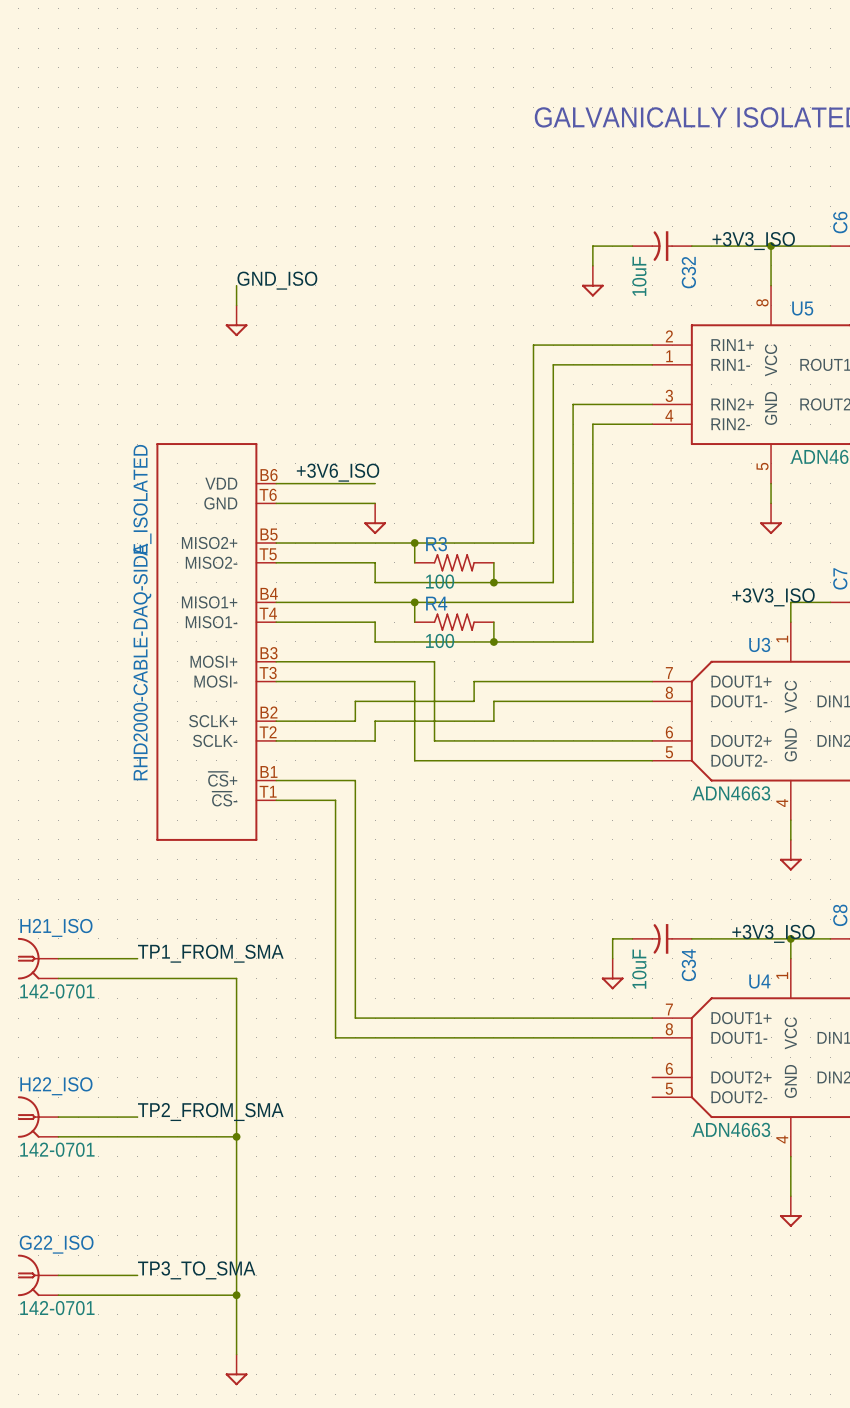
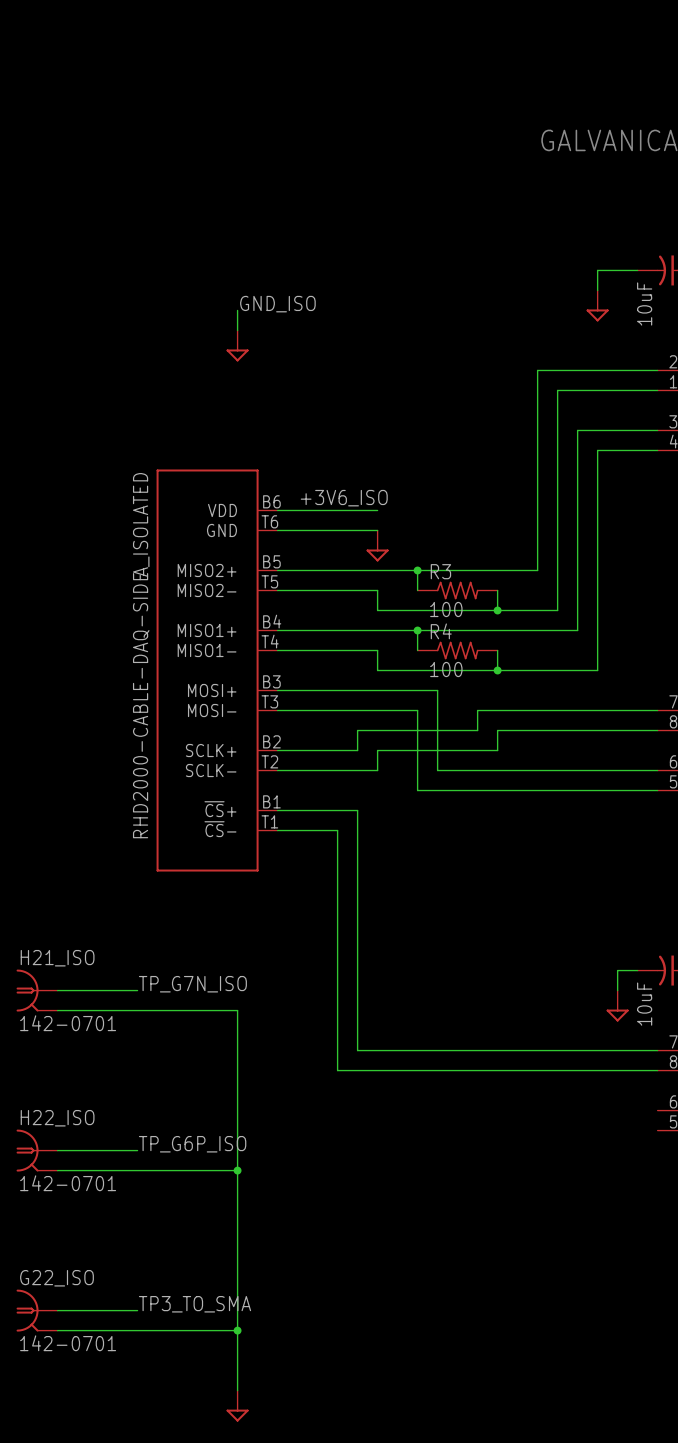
label: TP1_FROM_SMA (210, 953) -> TP_G7N_ISO (192, 984)
label: TP2_FROM_SMA (210, 1112) -> TP_G6P_ISO (192, 1144)

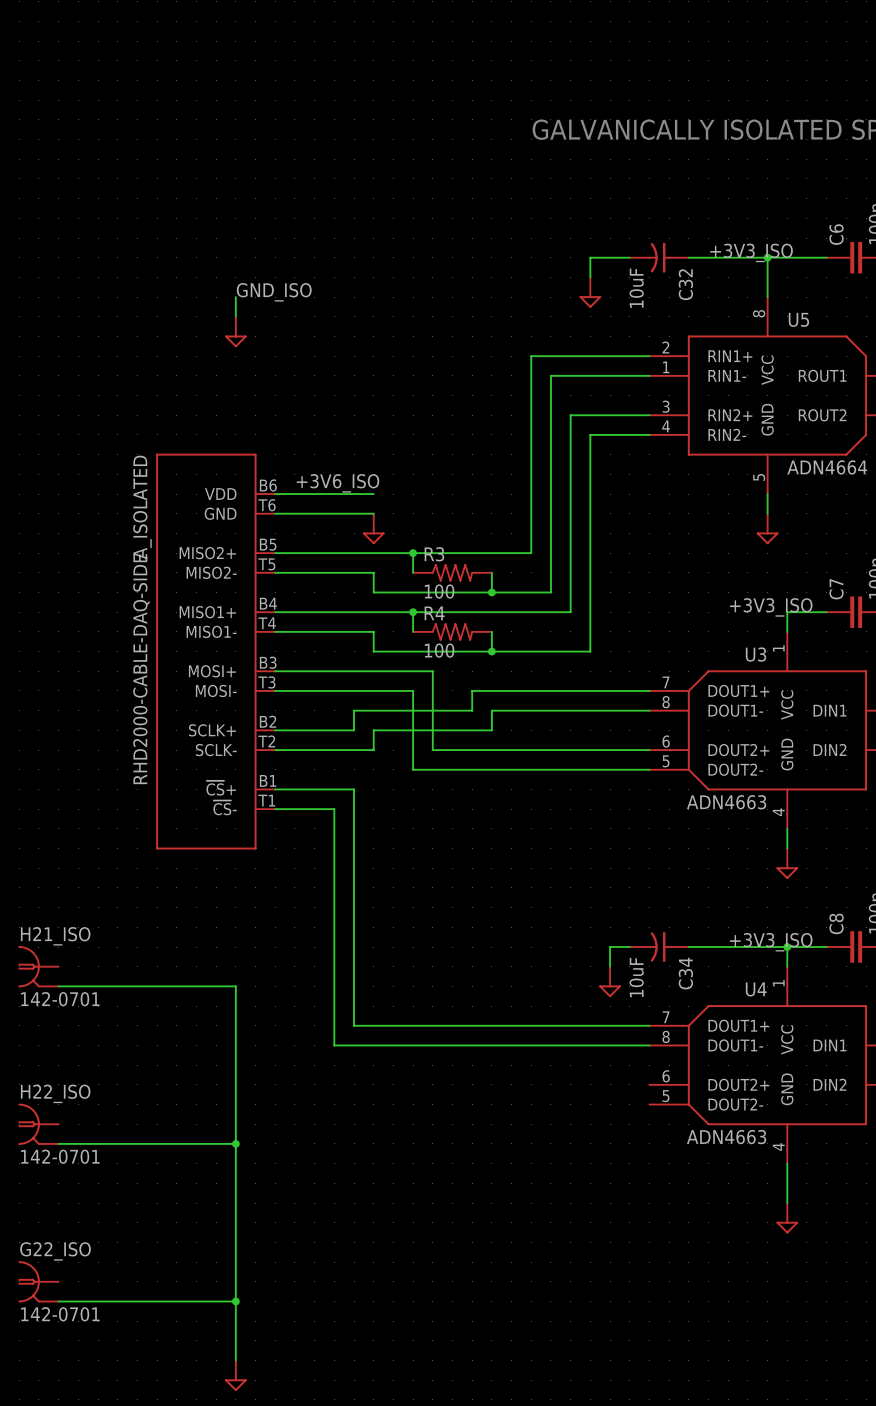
label: TP_G7N_ISO (192, 984) -> none
wire: (57, 990) (137, 990) -> none
label: TP_G6P_ISO (192, 1144) -> none
wire: (57, 1150) (137, 1150) -> none
label: TP3_TO_SMA (195, 1304) -> none
wire: (57, 1310) (137, 1310) -> none

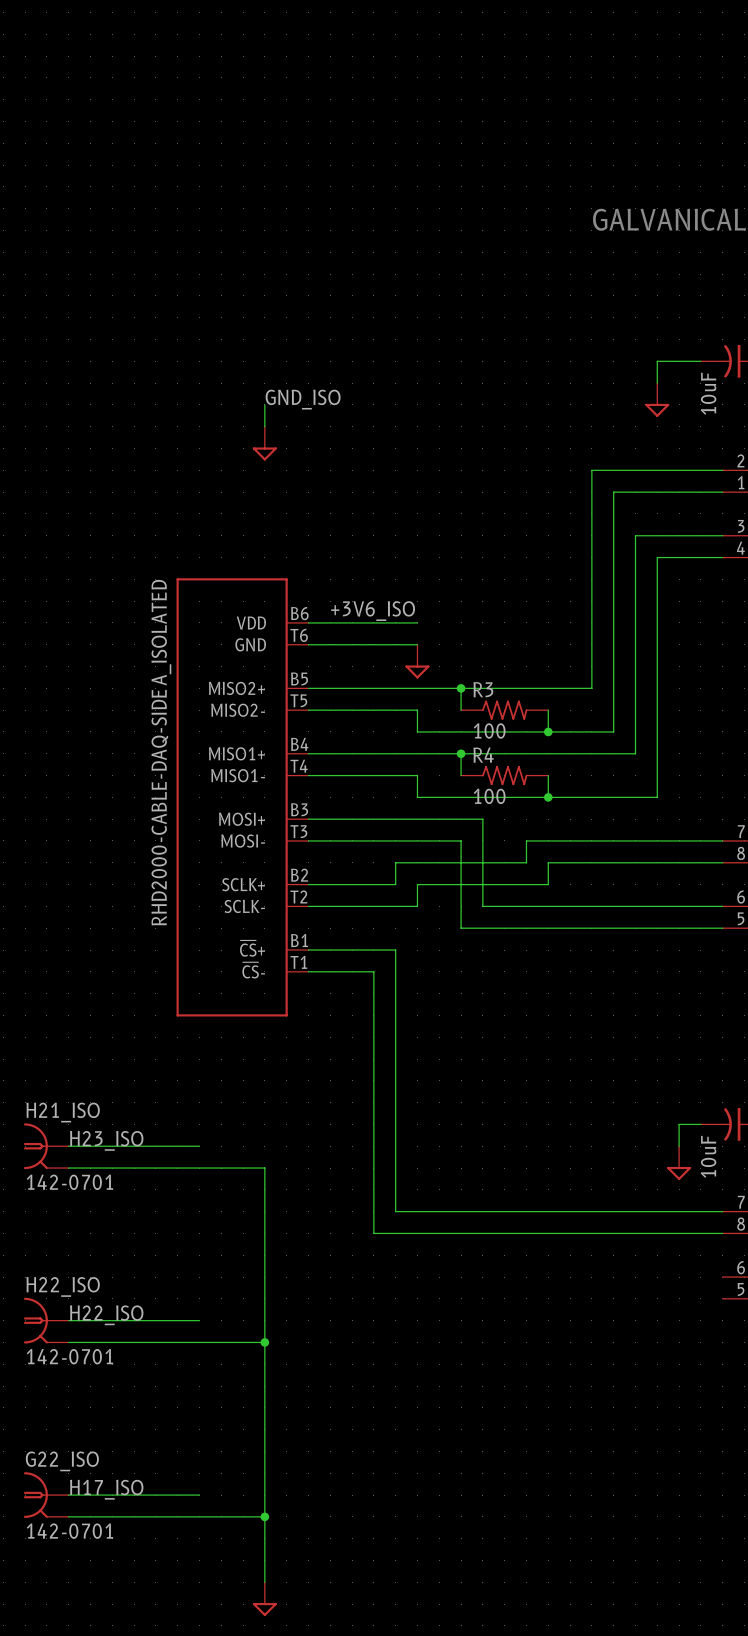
label: none -> H23_ISO (106, 1140)
wire: none -> (68, 1146) (199, 1146)
label: none -> H22_ISO (106, 1315)
wire: none -> (68, 1320) (199, 1320)
label: none -> H17_ISO (106, 1489)
wire: none -> (68, 1495) (199, 1495)

